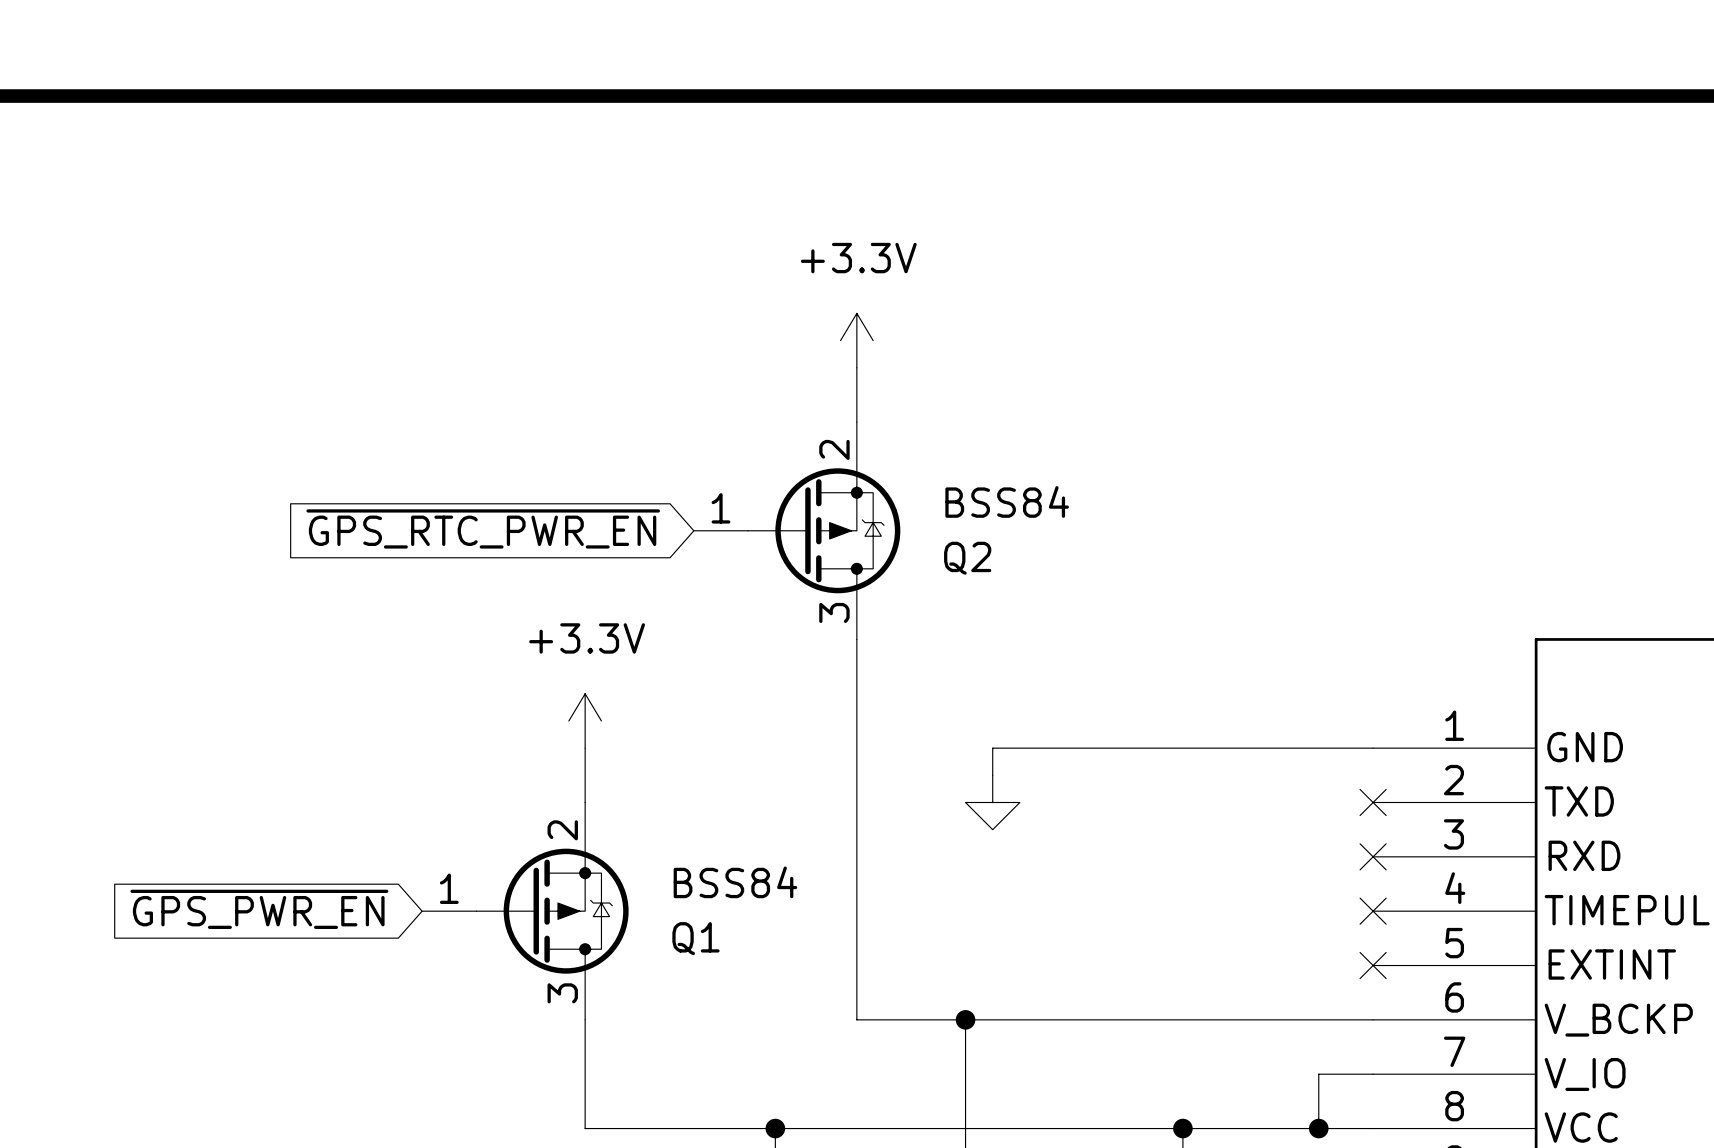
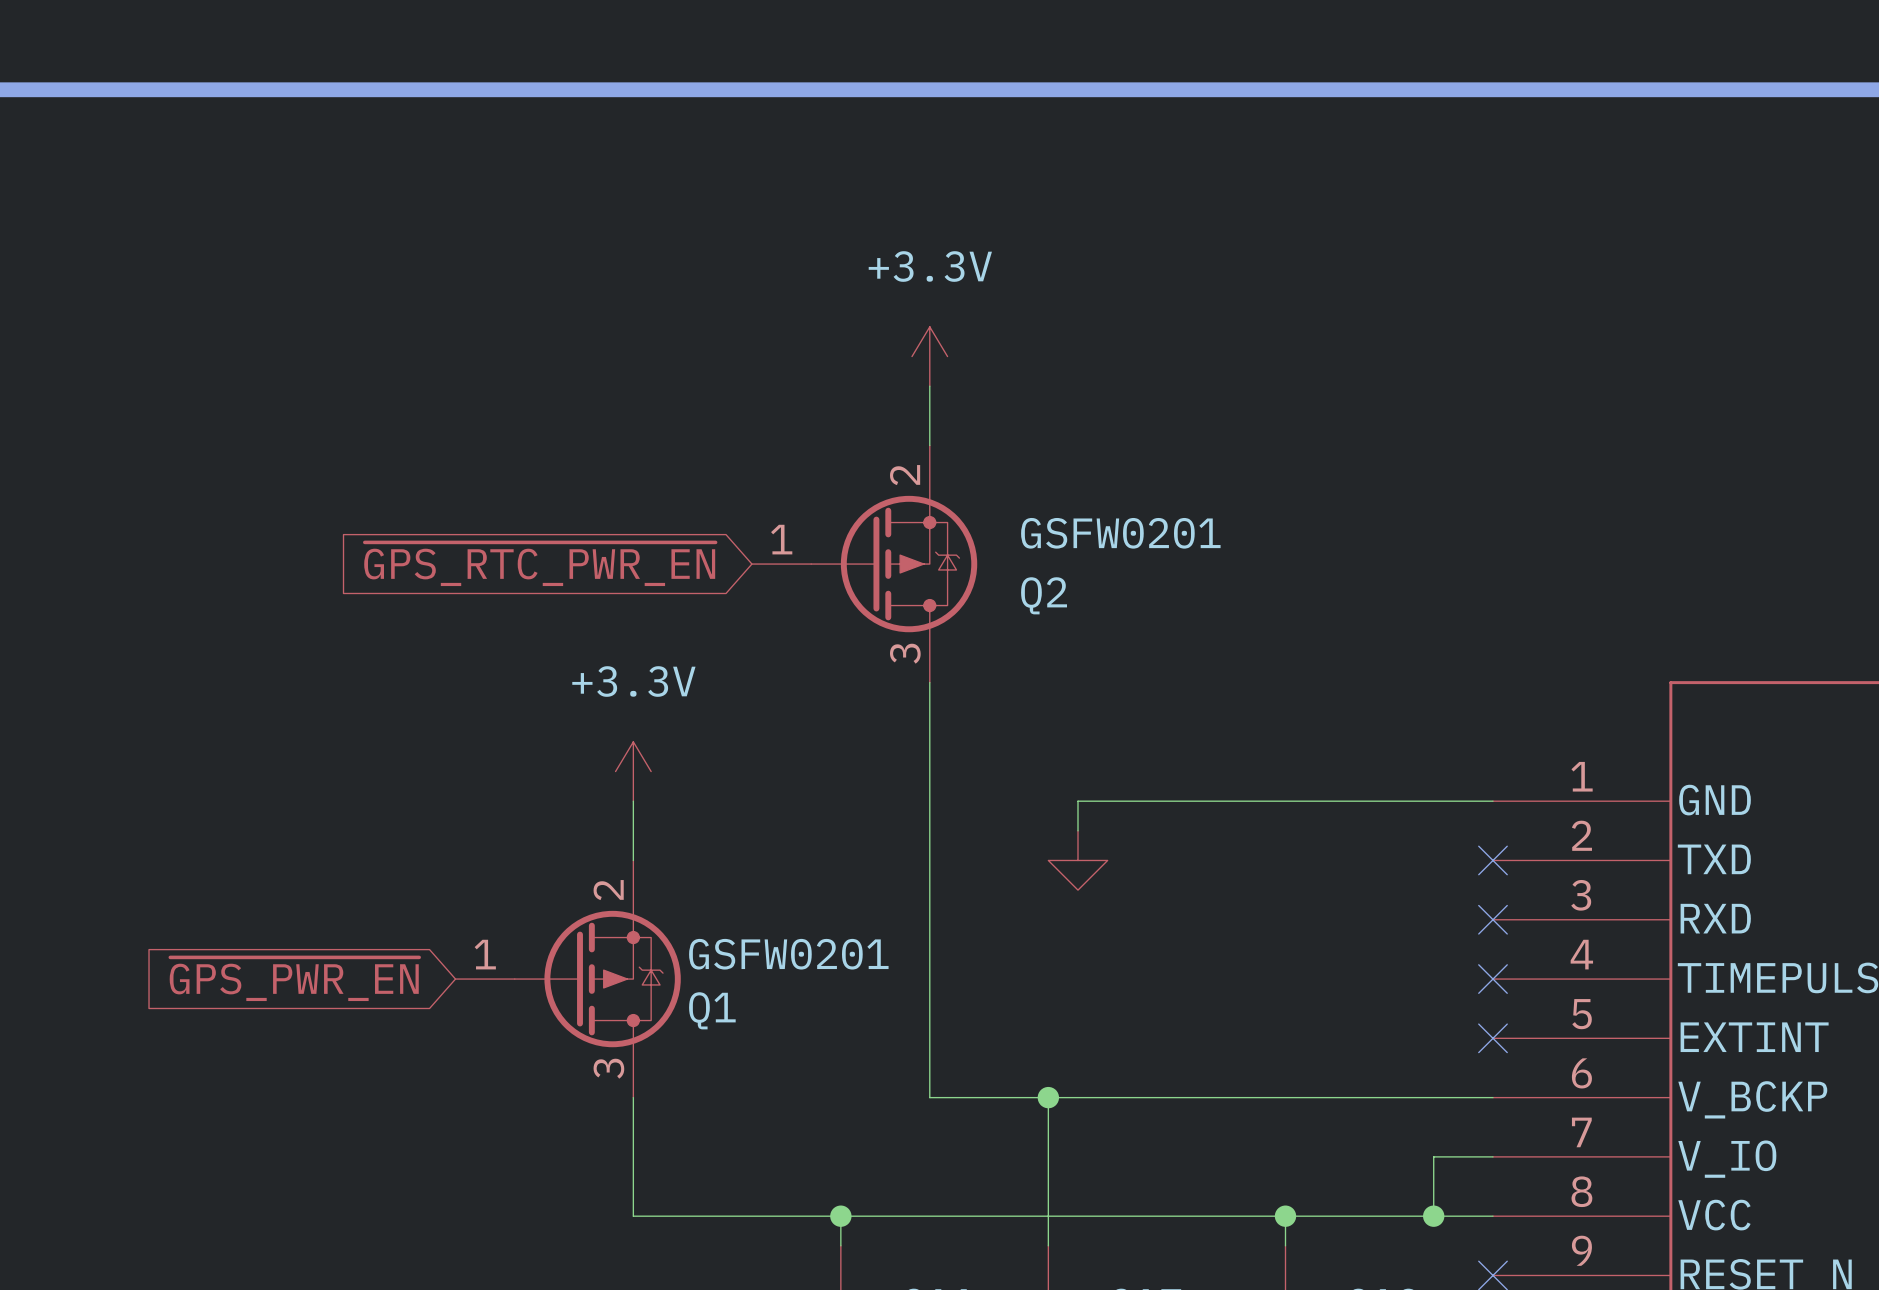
Q2 value: BSS84 (1007, 501) -> GSFW0201 (1120, 533)
Q1 value: BSS84 (735, 882) -> GSFW0201 (788, 954)
Q1 name position: Q1 (695, 938) -> Q1 (712, 1010)

